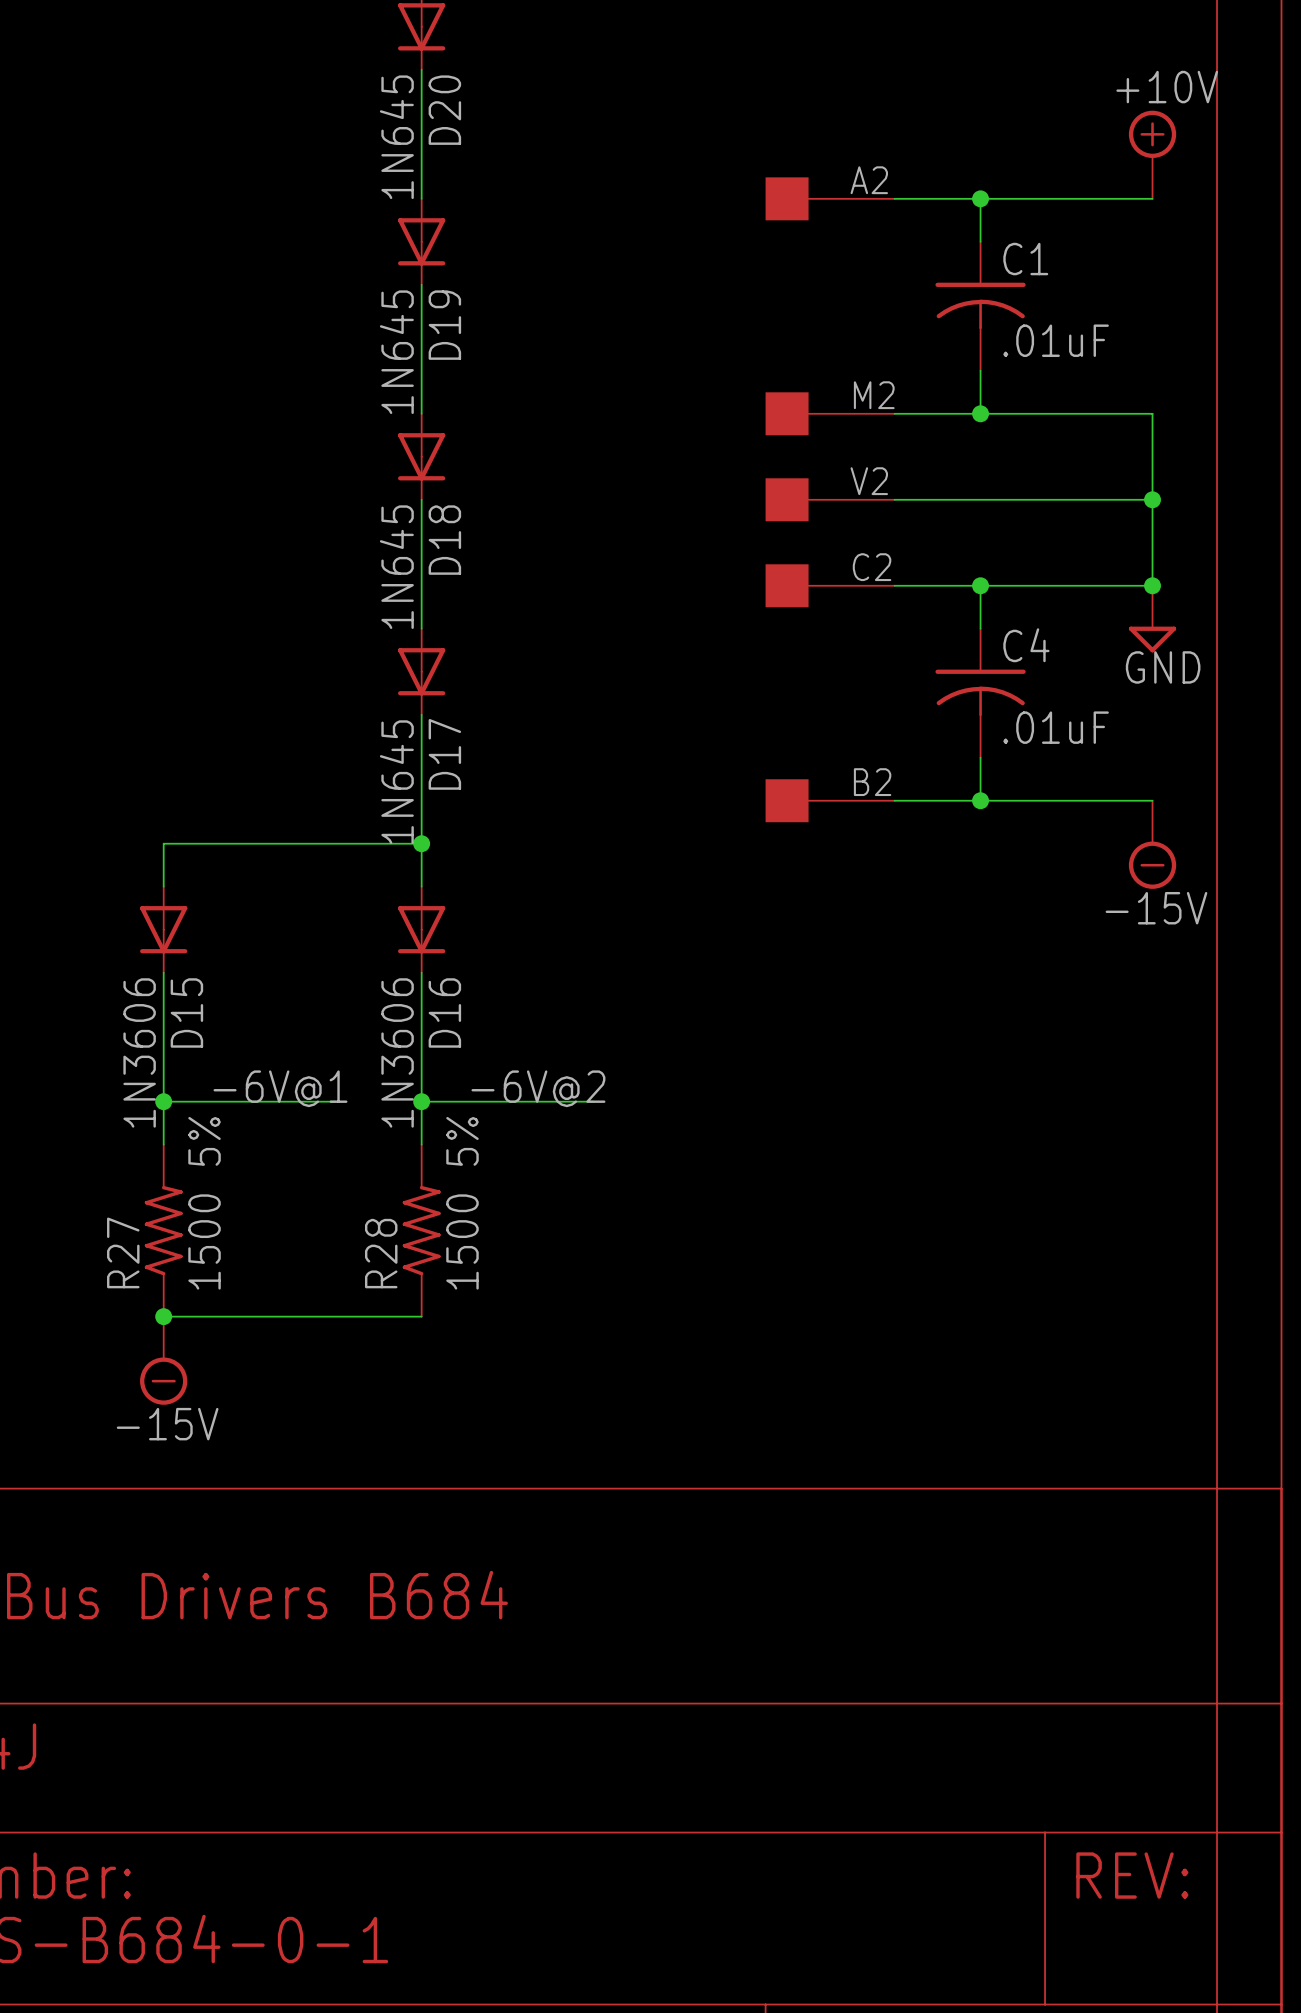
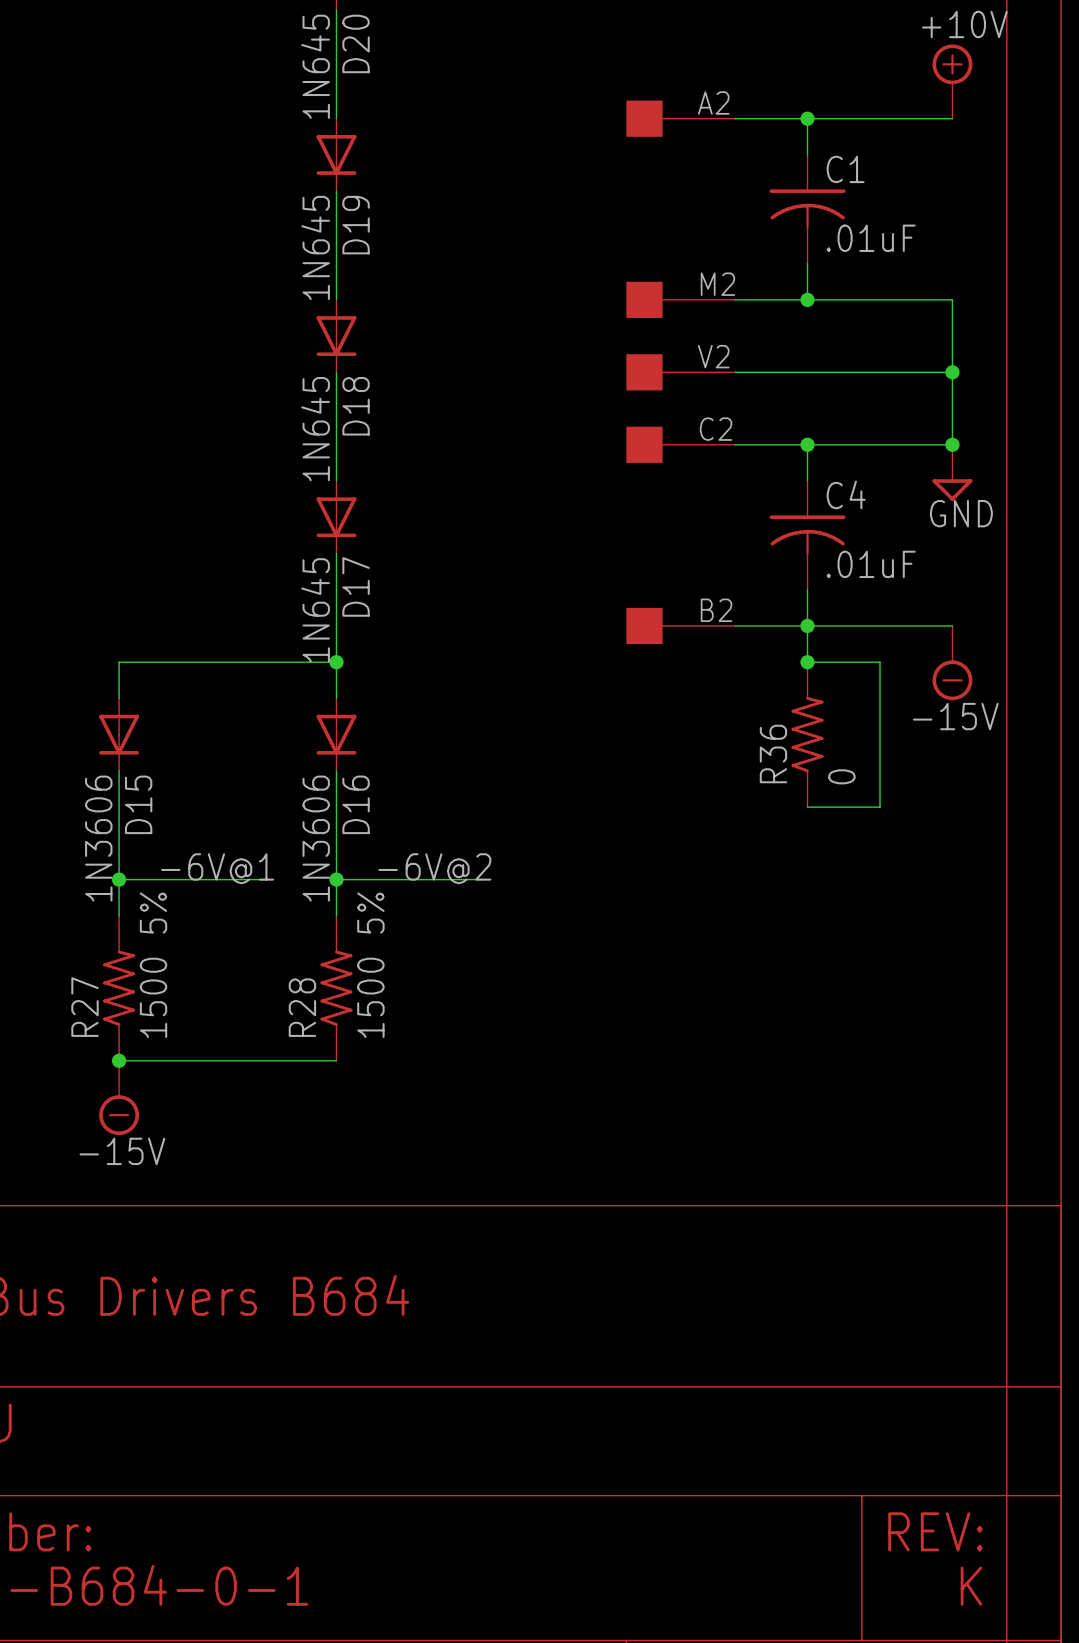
wire: none -> (807, 625) (807, 662) (879, 662) (879, 807) (807, 807)
junction: none -> (807, 662)
R36: none -> 0 (807, 734)
text: none -> K (971, 1586)

